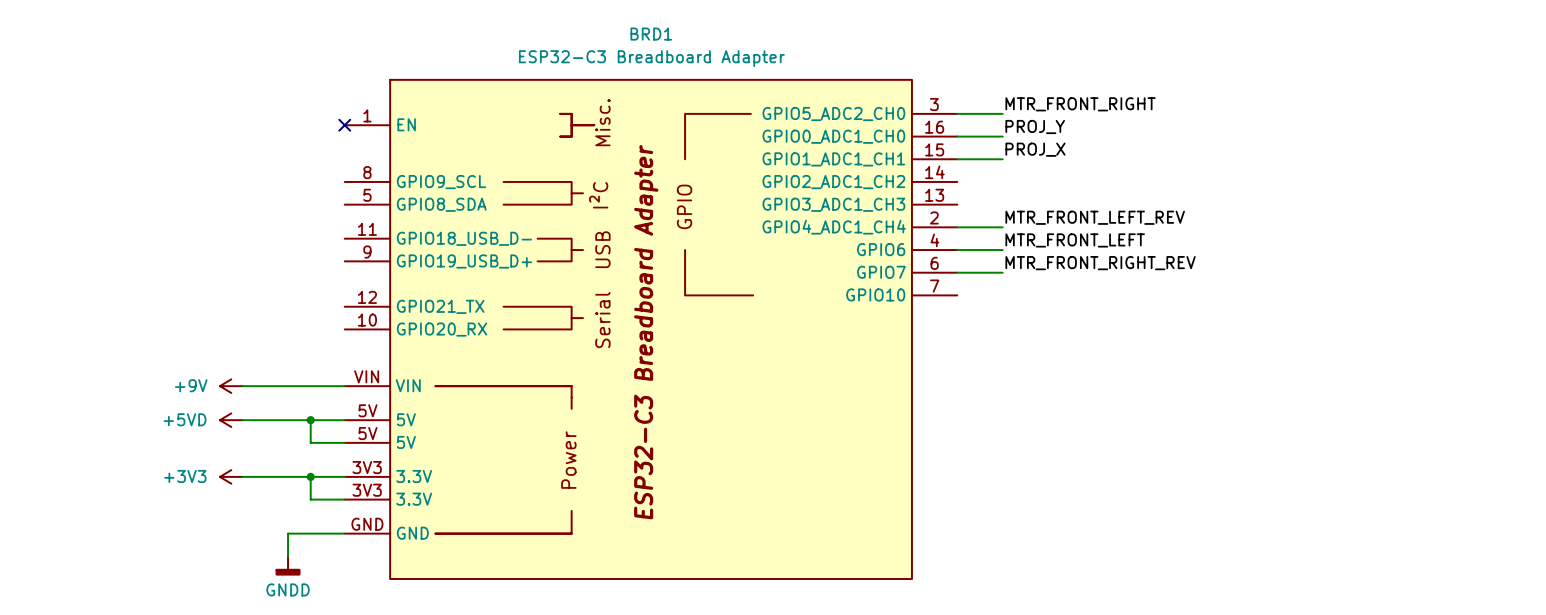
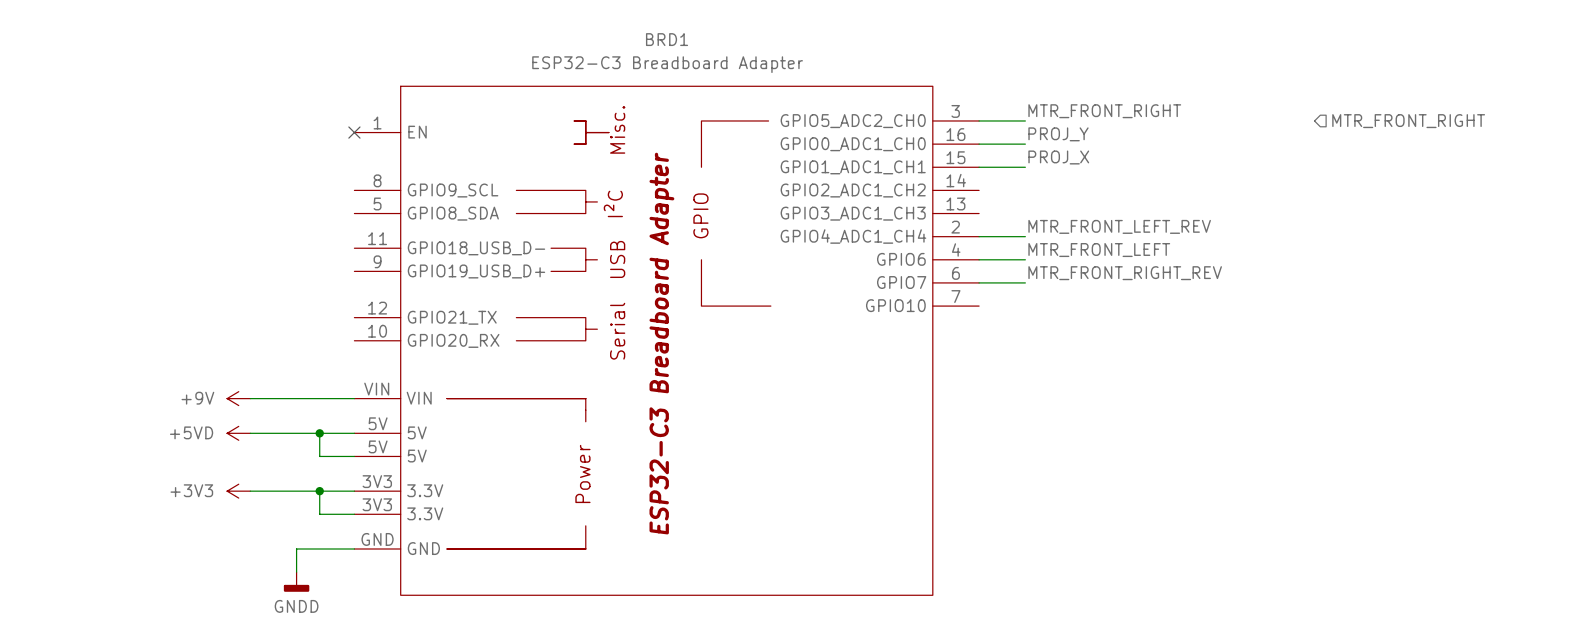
hierarchical label: none -> MTR_FRONT_RIGHT (1408, 121)

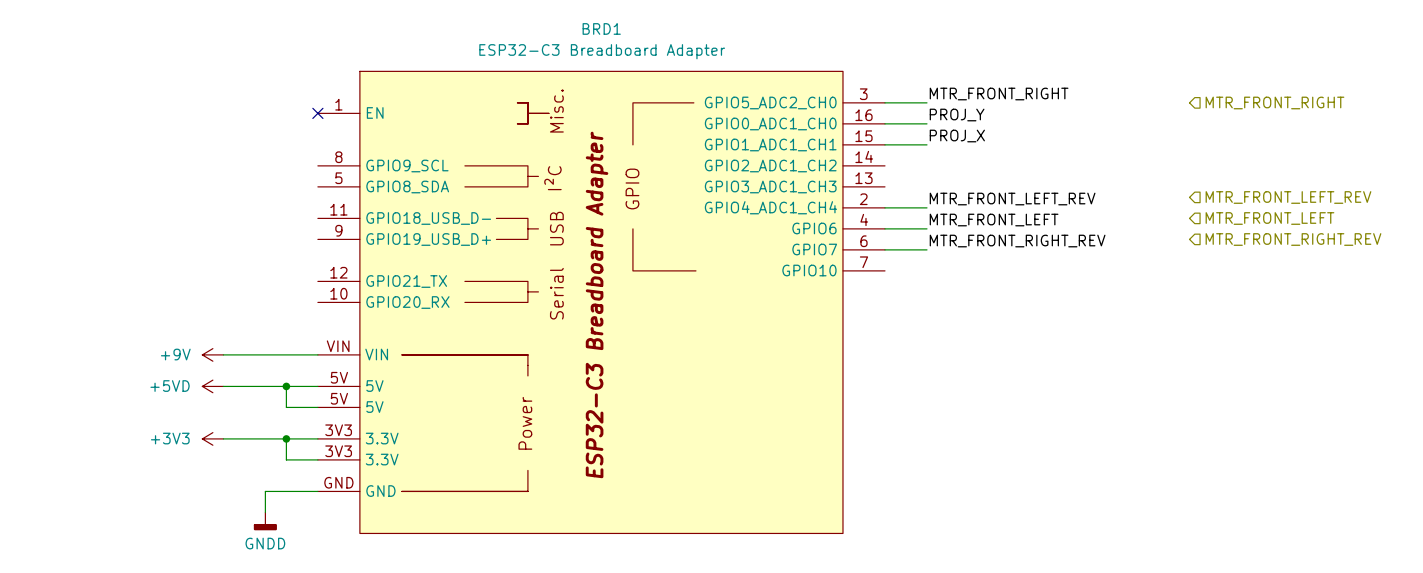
hierarchical label: none -> MTR_FRONT_LEFT_REV (1288, 197)
hierarchical label: none -> MTR_FRONT_LEFT (1269, 218)
hierarchical label: none -> MTR_FRONT_RIGHT_REV (1293, 239)

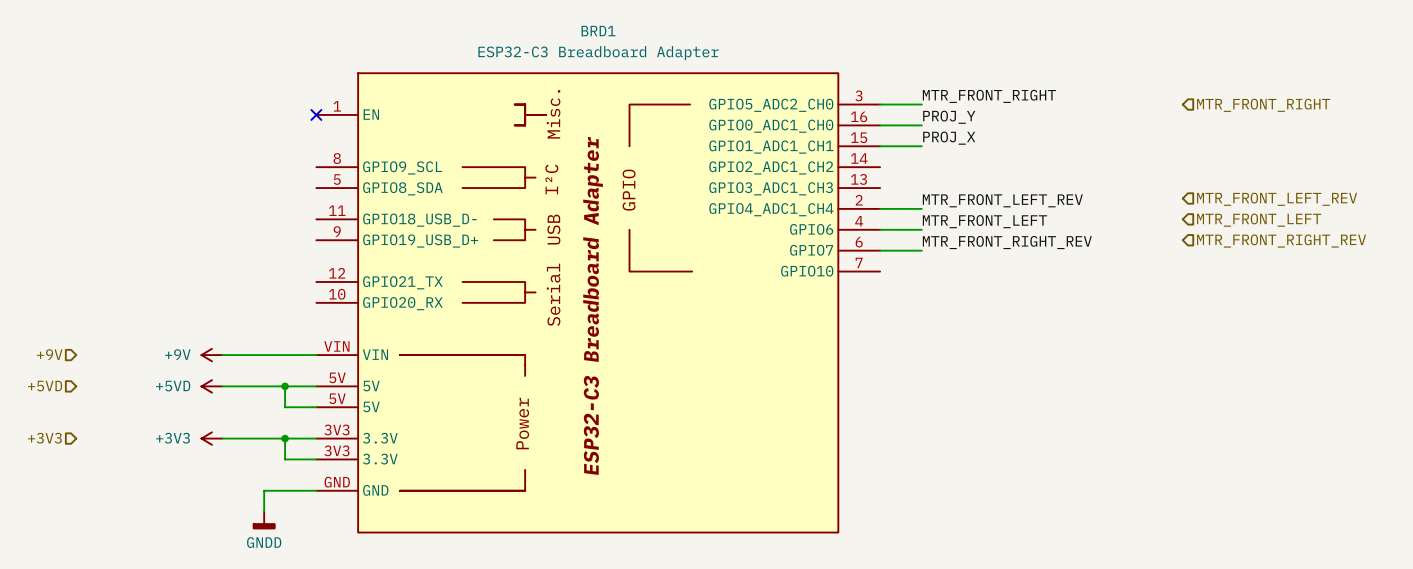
hierarchical label: none -> +9V (49, 354)
hierarchical label: none -> +5VD (45, 386)
hierarchical label: none -> +3V3 (44, 438)

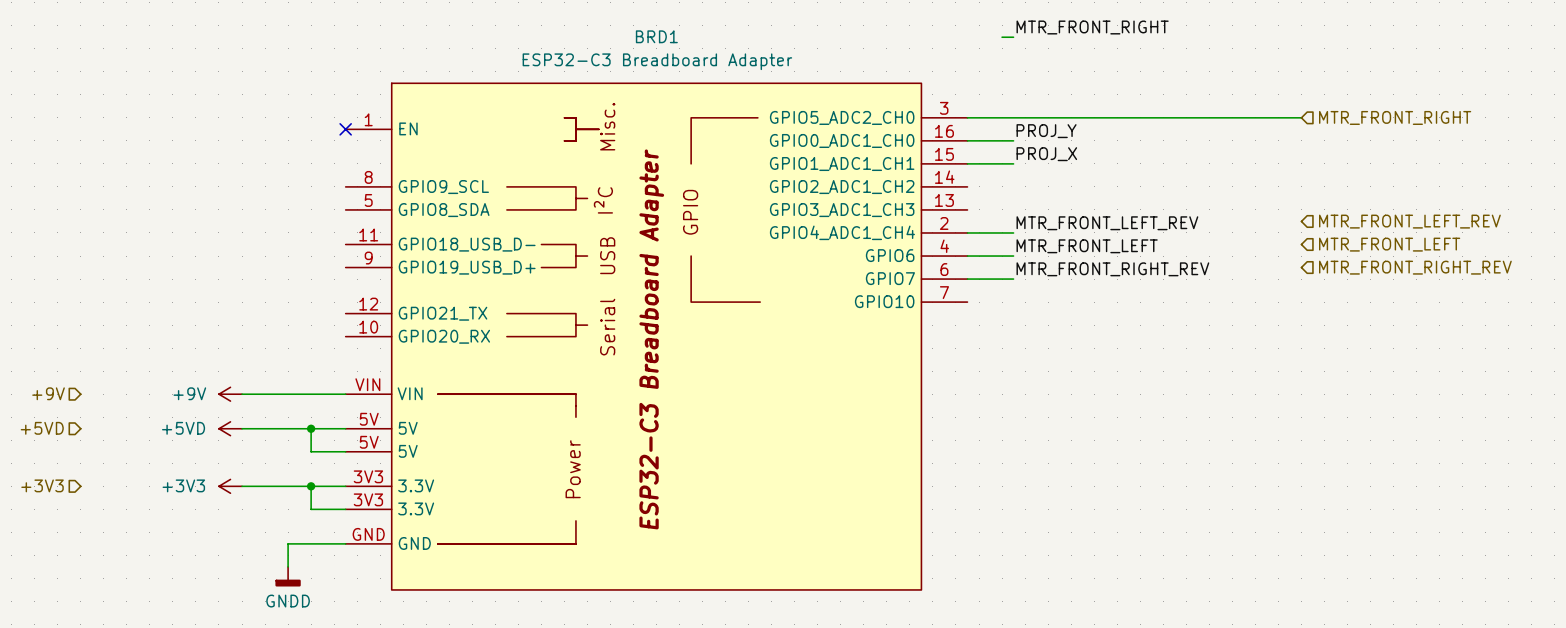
wire: none -> (1002, 37) (1013, 37)
label position: MTR_FRONT_RIGHT (989, 96) -> MTR_FRONT_RIGHT (1092, 27)
wire: none -> (1013, 117) (1301, 117)

